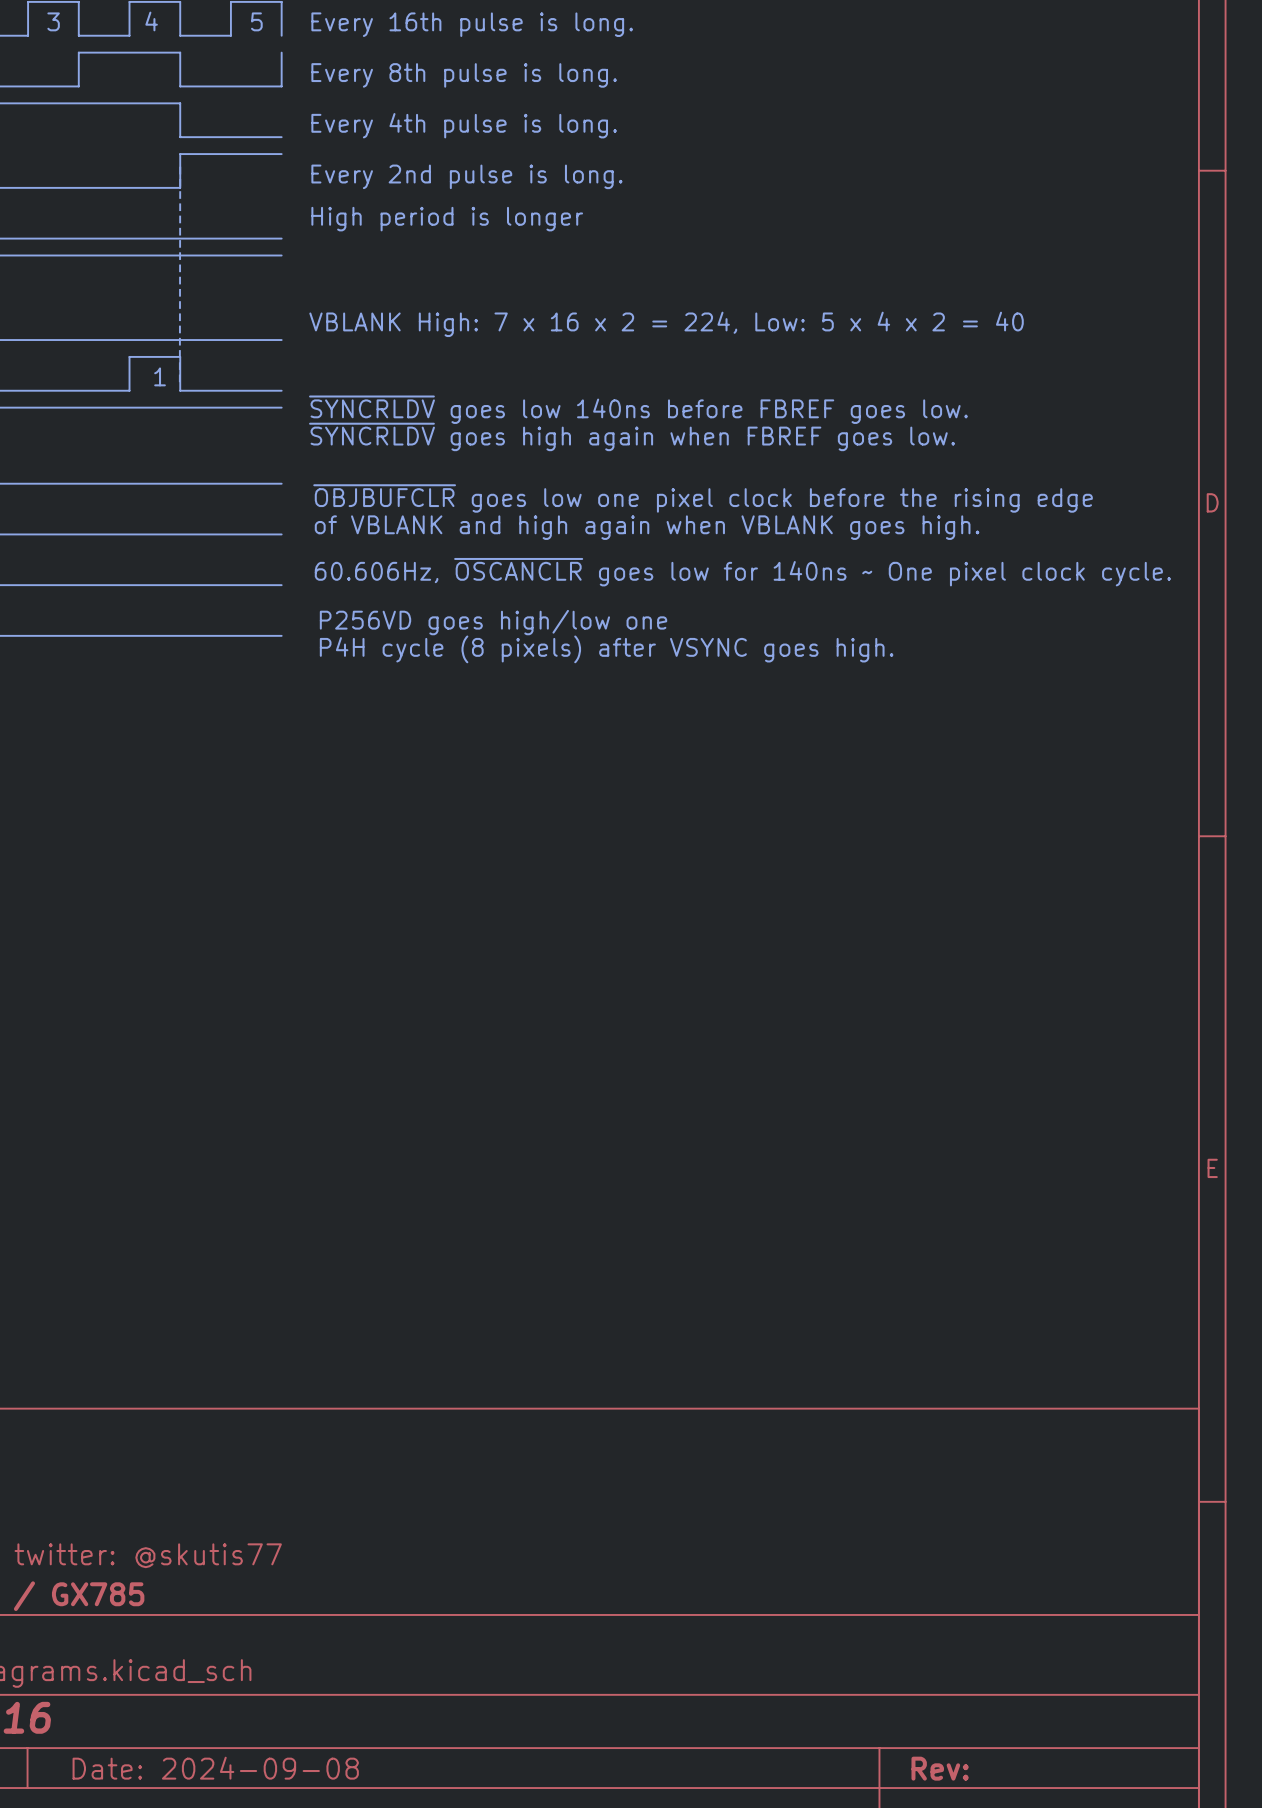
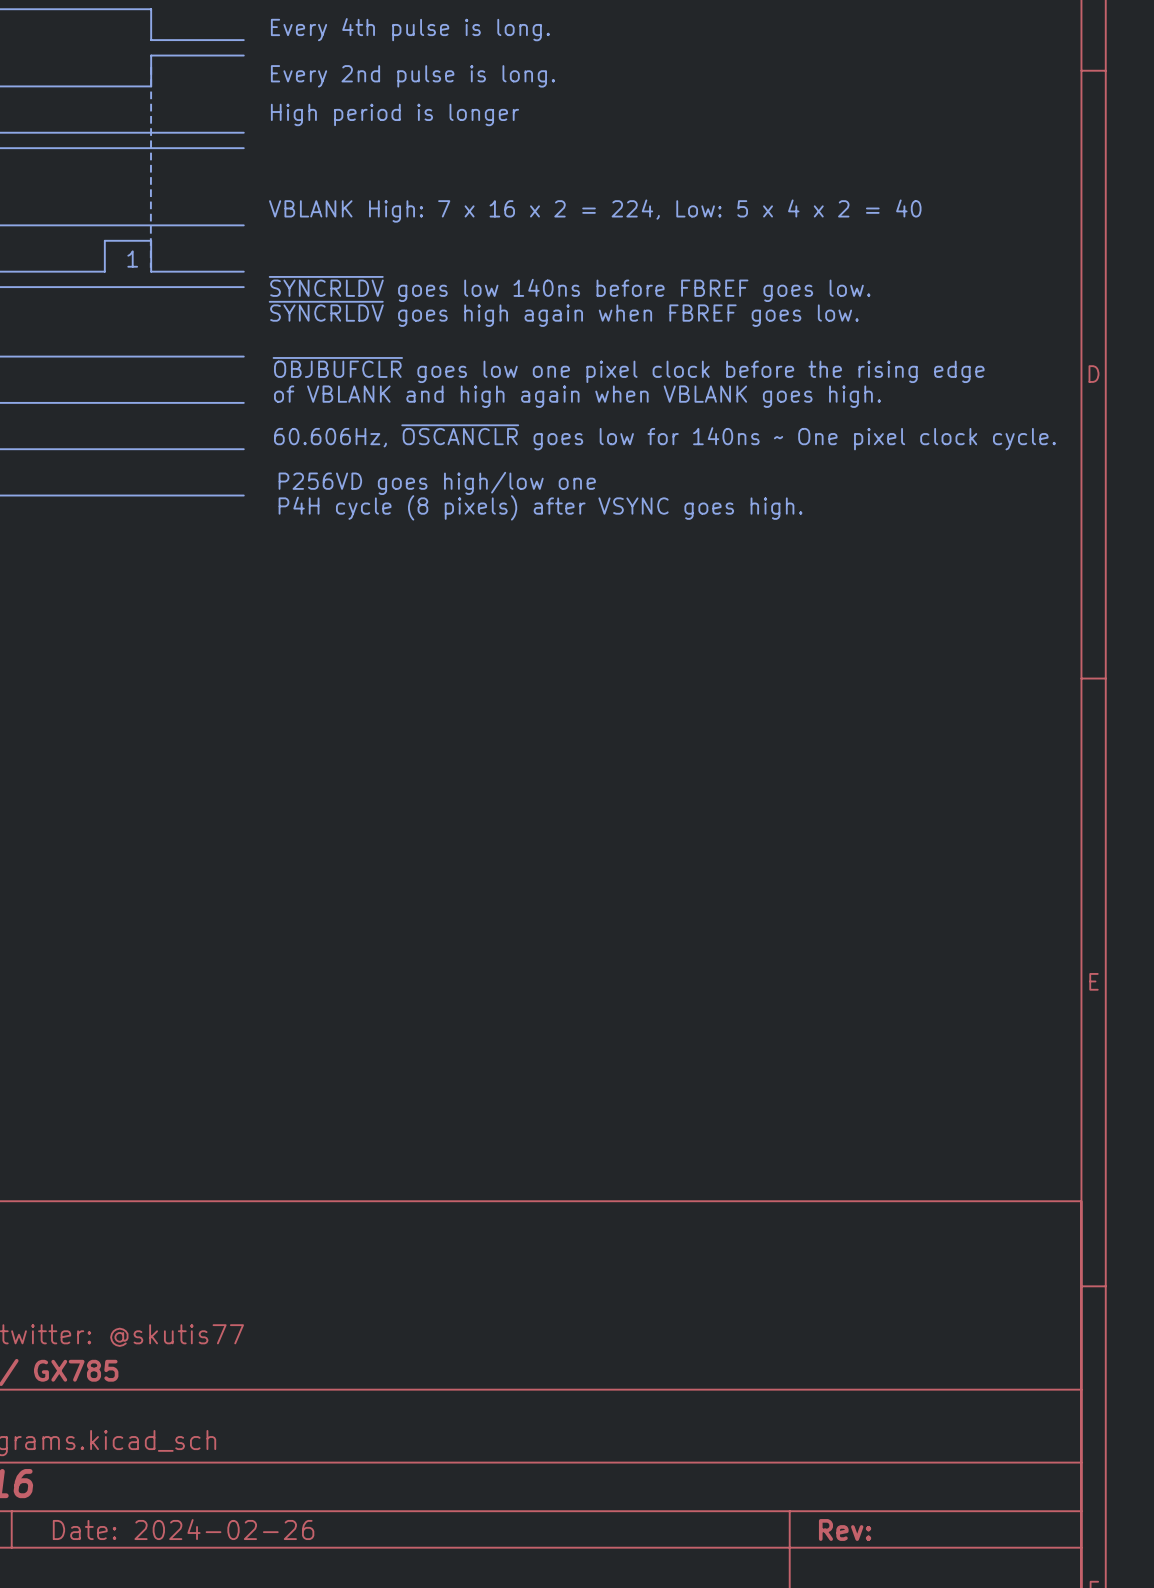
title block: Date: 2024-09-08 (215, 1768) -> Date: 2024-02-26 (183, 1529)

